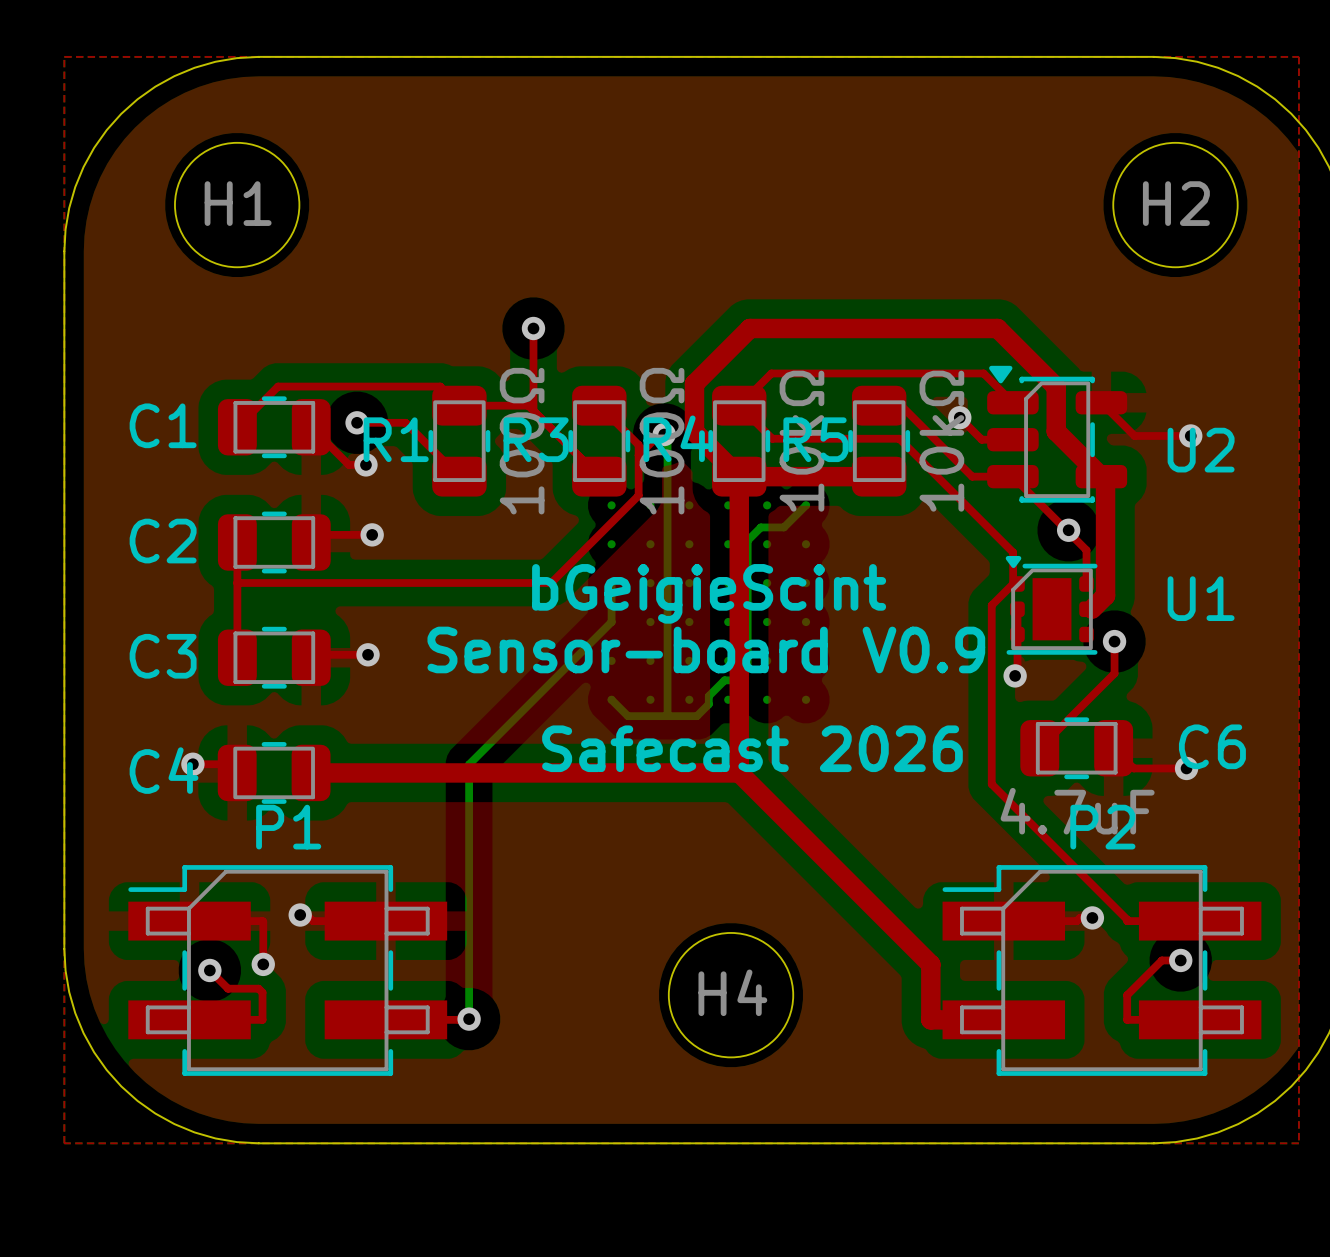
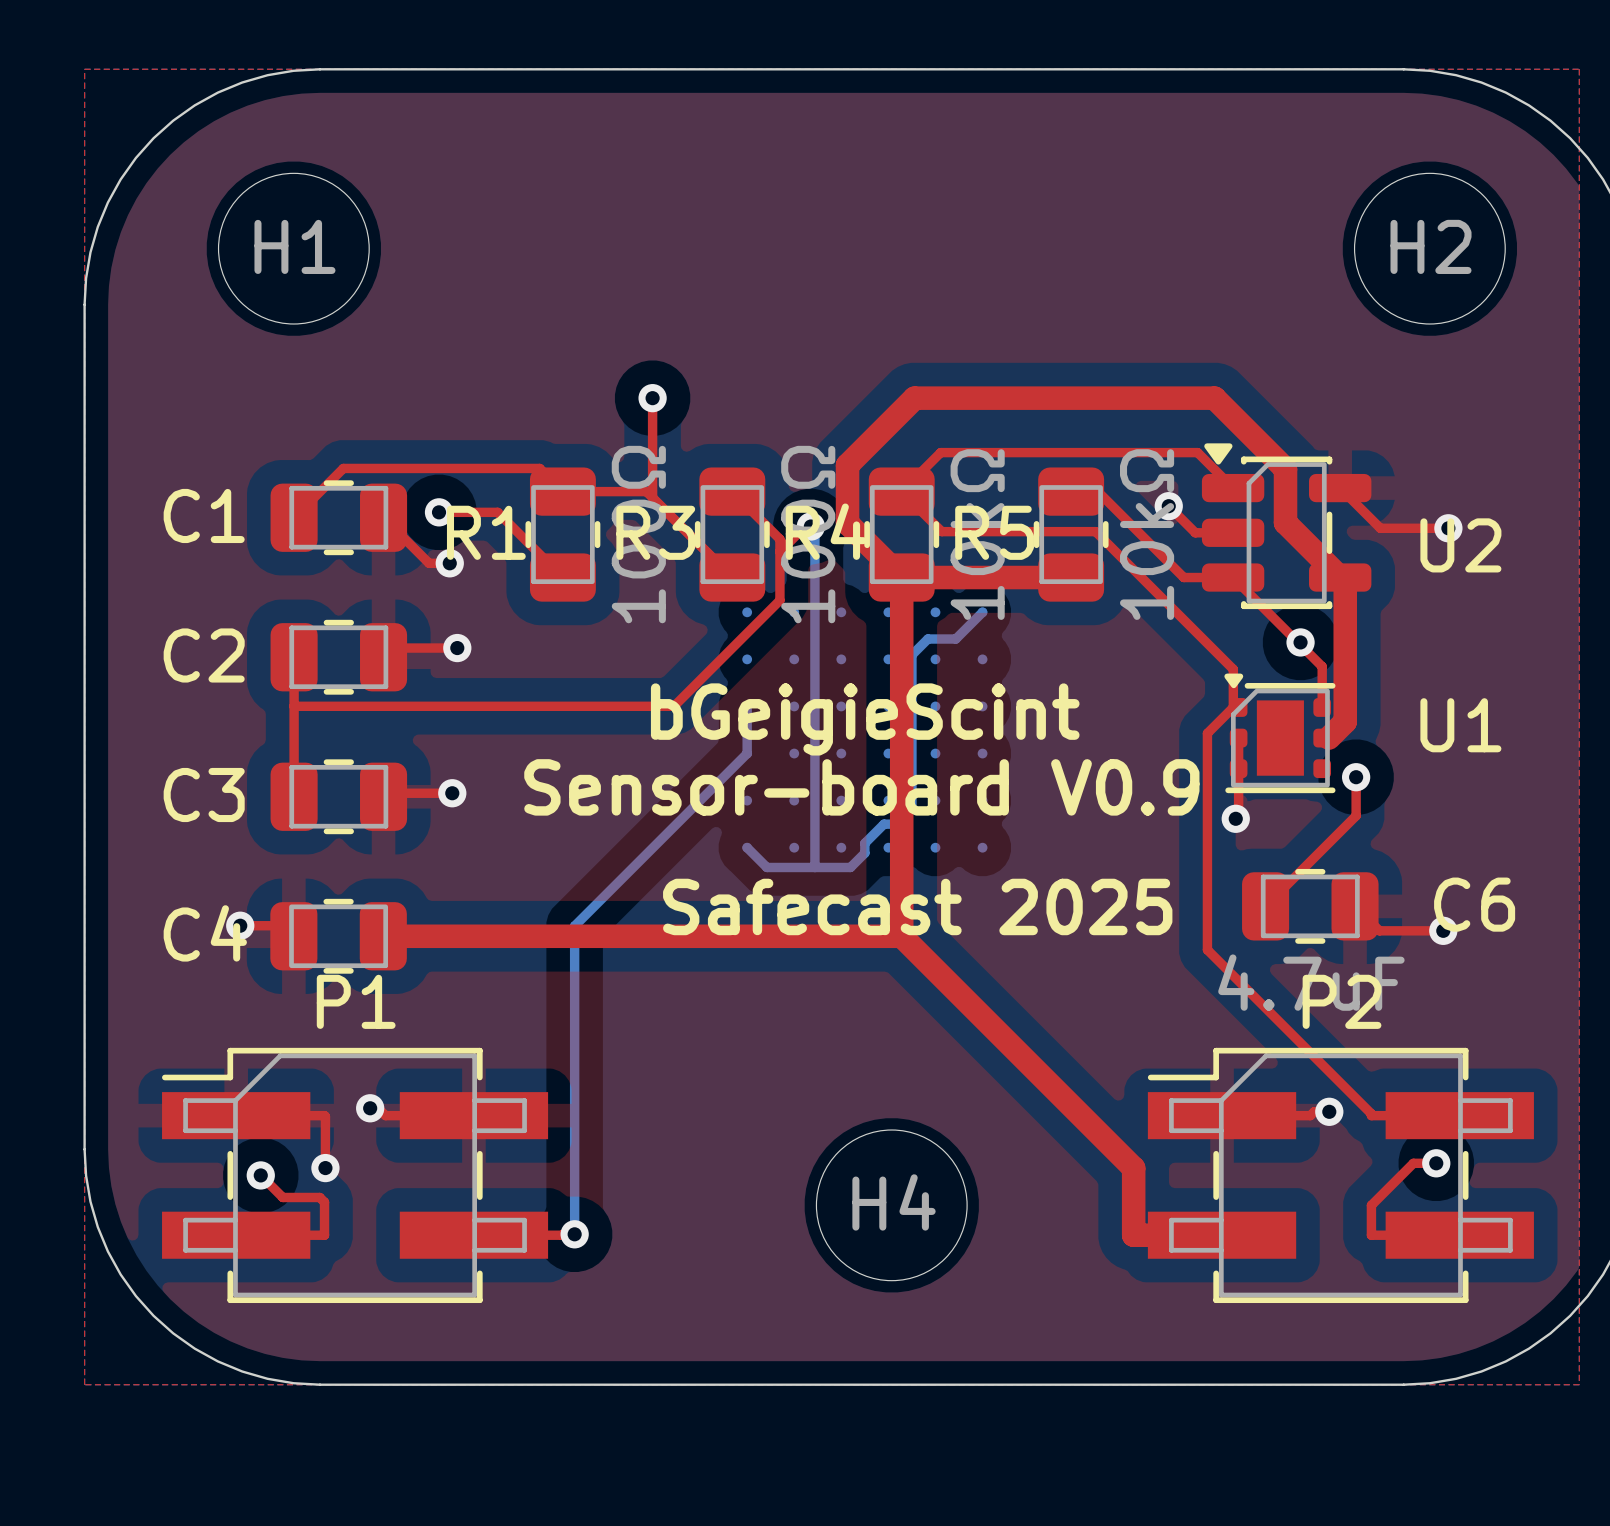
text: Safecast 2026 (752, 748) -> Safecast 2025 (917, 906)

